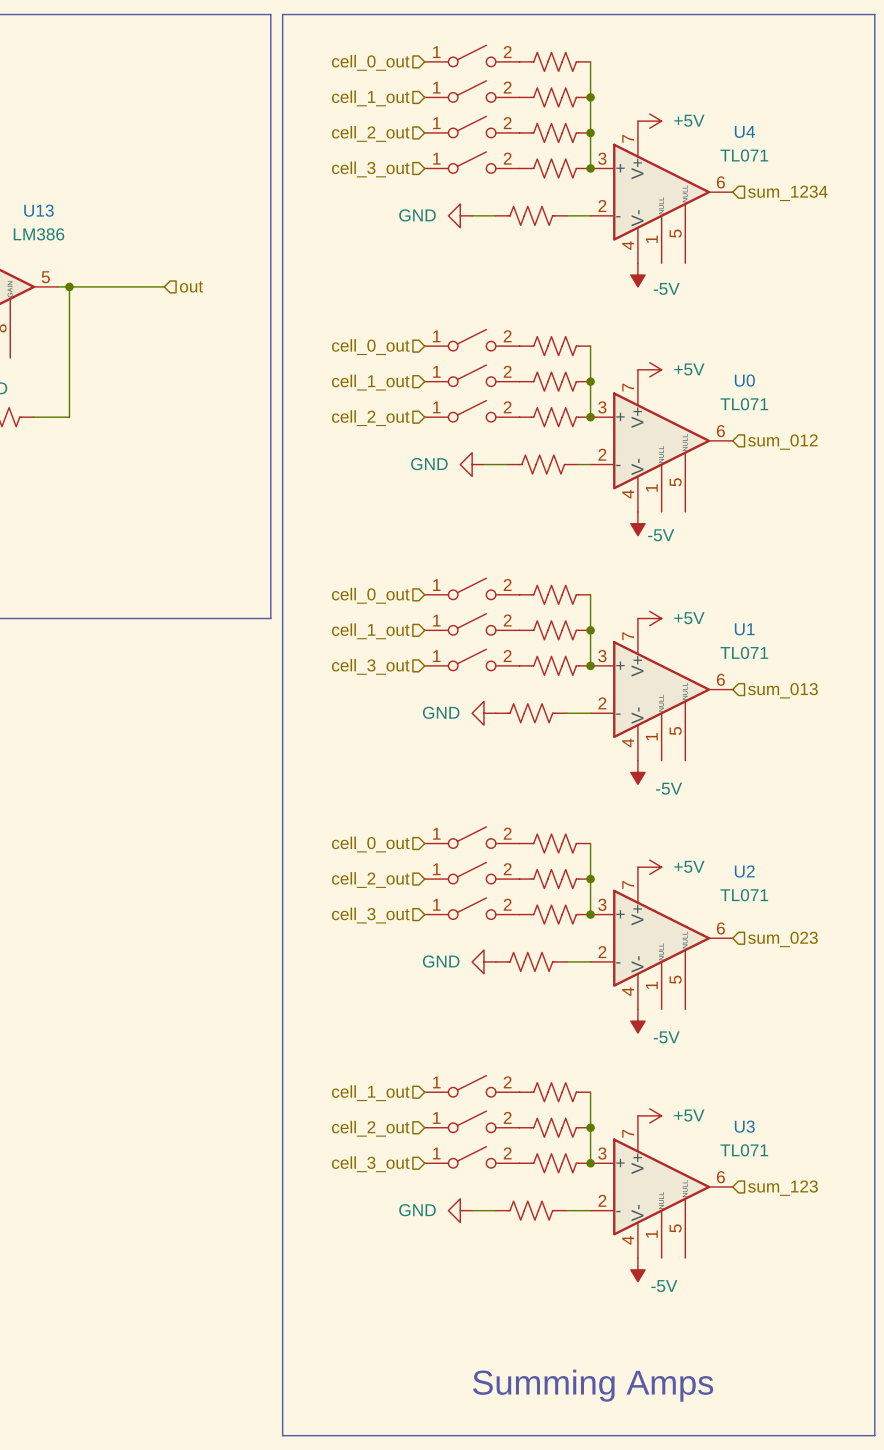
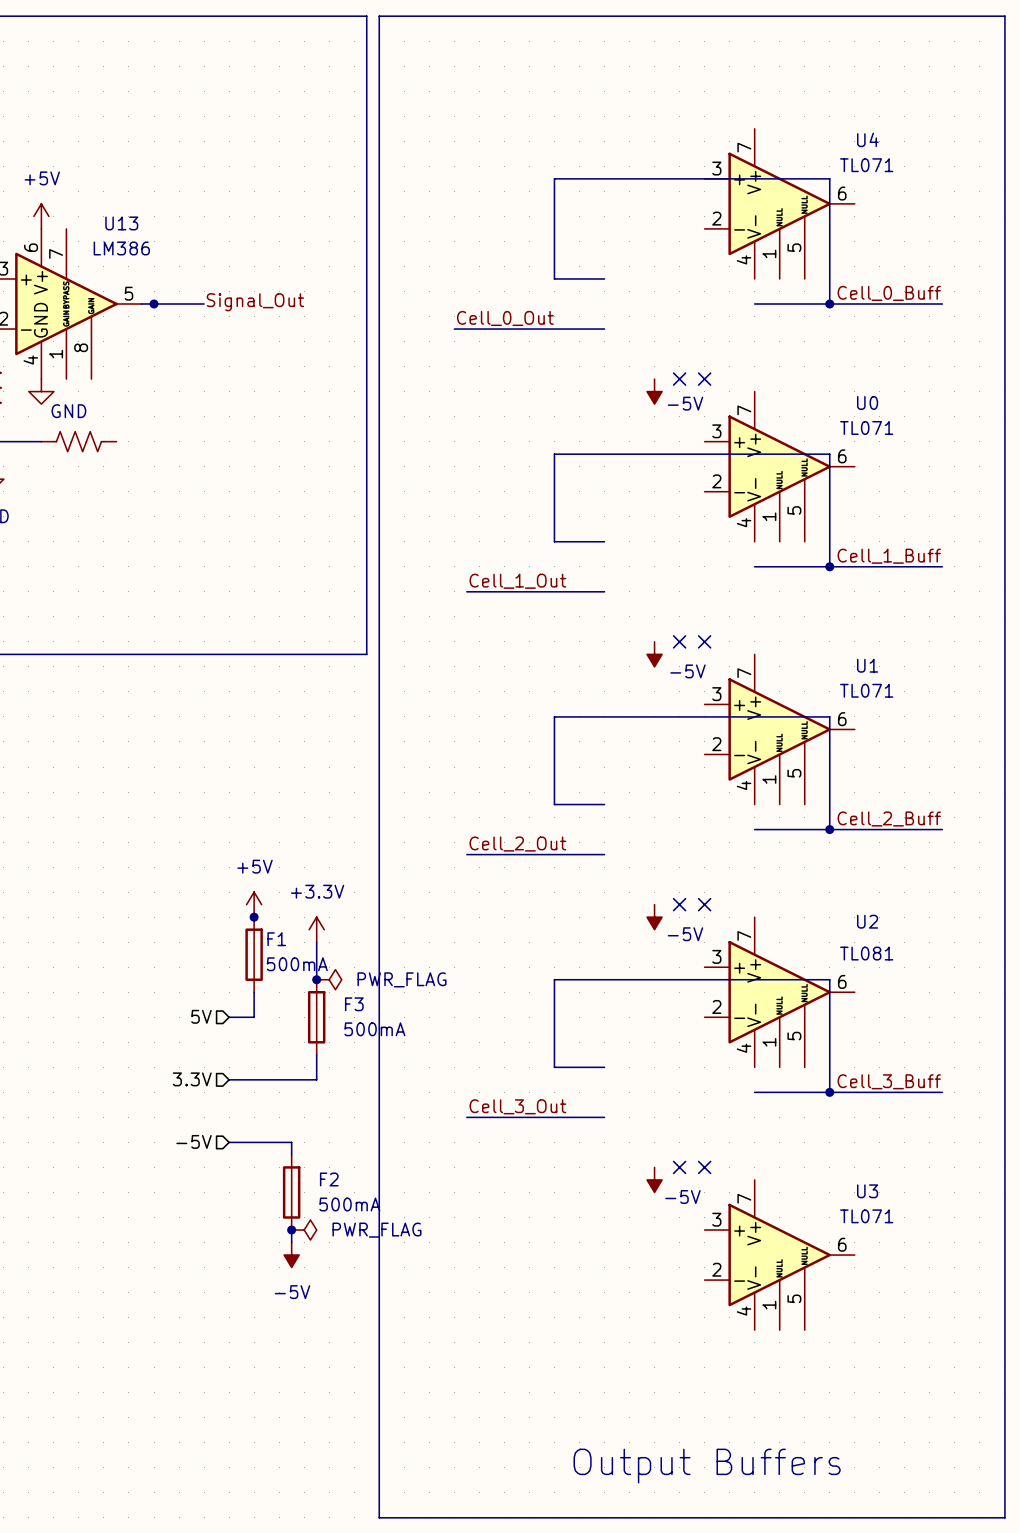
part: (472, 55) -> none
part: (555, 61) -> none
wire: (590, 61) (590, 168) -> none
hierarchical label: cell_0_out (370, 62) -> none
part: (472, 91) -> none
part: (555, 97) -> none
junction: (590, 97) -> none
hierarchical label: cell_1_out (370, 98) -> none
power symbol: +5V (649, 121) -> none
part: (472, 127) -> none
part: (555, 132) -> none
junction: (590, 132) -> none
hierarchical label: cell_2_out (370, 133) -> none
part: (472, 162) -> none
part: (555, 168) -> none
junction: (590, 168) -> none
hierarchical label: cell_3_out (370, 169) -> none
hierarchical label: sum_1234 (787, 193) -> none
power symbol: GND (460, 215) -> none
wire: (472, 215) (495, 215) -> none
part: (531, 215) -> none
wire: (566, 215) (590, 215) -> none
wire: none -> (604, 278) (554, 278) (554, 178) (829, 178) (829, 304)
power symbol: -5V (637, 275) -> none
label: none -> Cell_0_Buff (889, 293)
label: none -> Signal_Out (255, 302)
wire: (69, 286) (69, 417) (33, 417) -> none
wire: (116, 286) (164, 286) -> none
hierarchical label: out (191, 286) -> none
wire: none -> (754, 304) (942, 304)
junction: none -> (829, 304)
label: none -> Cell_0_Out (505, 318)
wire: none -> (454, 329) (604, 329)
part: (472, 340) -> none
part: (555, 346) -> none
wire: (590, 346) (590, 417) -> none
hierarchical label: cell_0_out (370, 347) -> none
no-connect mark: none -> (679, 379)
no-connect mark: none -> (704, 379)
power symbol: none -> -5V (654, 391)
power symbol: +5V (649, 369) -> none
part: (472, 375) -> none
part: (555, 381) -> none
junction: (590, 381) -> none
hierarchical label: cell_1_out (370, 382) -> none
part: (472, 411) -> none
part: (555, 417) -> none
junction: (590, 417) -> none
hierarchical label: cell_2_out (370, 418) -> none
hierarchical label: sum_012 (782, 442) -> none
power symbol: GND (472, 464) -> none
wire: (483, 464) (507, 464) -> none
part: (543, 464) -> none
wire: (578, 464) (590, 464) -> none
wire: none -> (604, 541) (554, 541) (554, 454) (829, 454) (829, 566)
power symbol: -5V (637, 523) -> none
label: none -> Cell_1_Buff (889, 556)
wire: none -> (754, 566) (942, 566)
junction: none -> (829, 566)
label: none -> Cell_1_Out (517, 581)
wire: none -> (466, 591) (604, 591)
part: (472, 588) -> none
part: (555, 594) -> none
wire: (590, 594) (590, 665) -> none
hierarchical label: cell_0_out (370, 595) -> none
no-connect mark: none -> (679, 641)
no-connect mark: none -> (704, 641)
power symbol: none -> -5V (654, 654)
power symbol: +5V (649, 618) -> none
part: (472, 624) -> none
part: (555, 630) -> none
junction: (590, 630) -> none
hierarchical label: cell_1_out (370, 631) -> none
part: (472, 659) -> none
part: (555, 665) -> none
junction: (590, 665) -> none
hierarchical label: cell_3_out (370, 666) -> none
hierarchical label: sum_013 (782, 690) -> none
power symbol: GND (483, 713) -> none
part: (531, 713) -> none
wire: (566, 713) (590, 713) -> none
wire: none -> (604, 804) (554, 804) (554, 716) (829, 716) (829, 829)
power symbol: -5V (637, 772) -> none
label: none -> Cell_2_Buff (889, 819)
wire: none -> (754, 829) (942, 829)
junction: none -> (829, 829)
label: none -> Cell_2_Out (517, 844)
wire: none -> (466, 854) (604, 854)
part: (472, 837) -> none
part: (555, 843) -> none
wire: (590, 843) (590, 914) -> none
hierarchical label: cell_0_out (370, 844) -> none
power symbol: none -> +5V (254, 904)
no-connect mark: none -> (679, 904)
no-connect mark: none -> (704, 904)
junction: none -> (254, 917)
power symbol: none -> -5V (654, 917)
power symbol: +5V (649, 867) -> none
part: (472, 873) -> none
power symbol: none -> +3.3V (316, 929)
part: (555, 879) -> none
junction: (590, 879) -> none
hierarchical label: cell_2_out (370, 880) -> none
wire: none -> (316, 942) (316, 979)
U2 value: TL071 (744, 895) -> TL081 (866, 953)
F1: none -> 500mA (254, 954)
part: (472, 908) -> none
part: (555, 914) -> none
junction: (590, 914) -> none
hierarchical label: cell_3_out (370, 915) -> none
junction: none -> (316, 979)
power symbol: none -> PWR_FLAG (329, 979)
wire: none -> (254, 992) (254, 1017) (229, 1017)
hierarchical label: sum_023 (782, 939) -> none
sheet pin: none -> 5V (201, 1016)
F3: none -> 500mA (316, 1017)
power symbol: GND (483, 961) -> none
part: (531, 961) -> none
wire: (566, 961) (590, 961) -> none
wire: none -> (316, 1054) (316, 1079) (229, 1079)
wire: none -> (604, 1067) (554, 1067) (554, 979) (829, 979) (829, 1092)
sheet pin: none -> 3.3V (192, 1079)
power symbol: -5V (637, 1021) -> none
label: none -> Cell_3_Buff (889, 1081)
wire: none -> (754, 1092) (942, 1092)
junction: none -> (829, 1092)
label: none -> Cell_3_Out (517, 1106)
wire: none -> (466, 1117) (604, 1117)
sheet pin: none -> -5V (194, 1141)
wire: none -> (229, 1142) (291, 1142) (291, 1154)
part: (472, 1086) -> none
part: (555, 1092) -> none
wire: (590, 1092) (590, 1163) -> none
hierarchical label: cell_1_out (370, 1093) -> none
no-connect mark: none -> (679, 1167)
no-connect mark: none -> (704, 1167)
power symbol: none -> -5V (654, 1179)
power symbol: +5V (649, 1115) -> none
part: (472, 1121) -> none
F2: none -> 500mA (291, 1192)
part: (555, 1127) -> none
junction: (590, 1127) -> none
hierarchical label: cell_2_out (370, 1128) -> none
part: (472, 1157) -> none
wire: none -> (291, 1230) (291, 1242)
junction: none -> (291, 1230)
power symbol: none -> PWR_FLAG (304, 1230)
part: (555, 1163) -> none
junction: (590, 1163) -> none
hierarchical label: cell_3_out (370, 1164) -> none
power symbol: none -> -5V (291, 1255)
hierarchical label: sum_123 (782, 1188) -> none
power symbol: GND (460, 1210) -> none
wire: (472, 1210) (495, 1210) -> none
part: (531, 1210) -> none
wire: (566, 1210) (590, 1210) -> none
power symbol: -5V (637, 1269) -> none
text: Summing Amps (593, 1385) -> Output Buffers (707, 1466)

